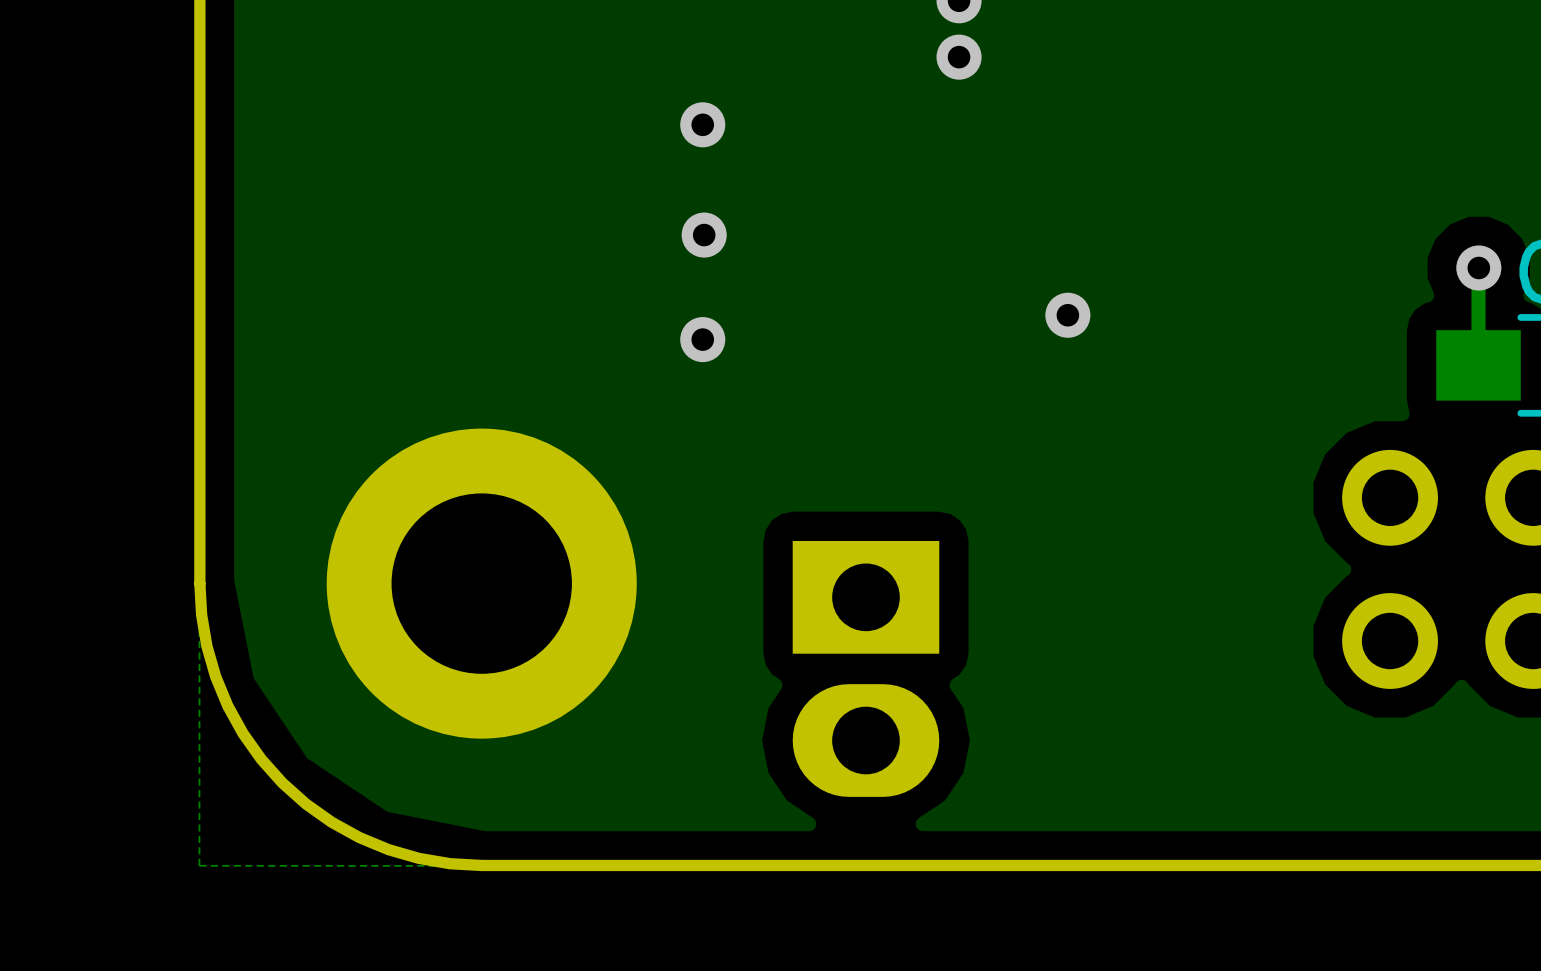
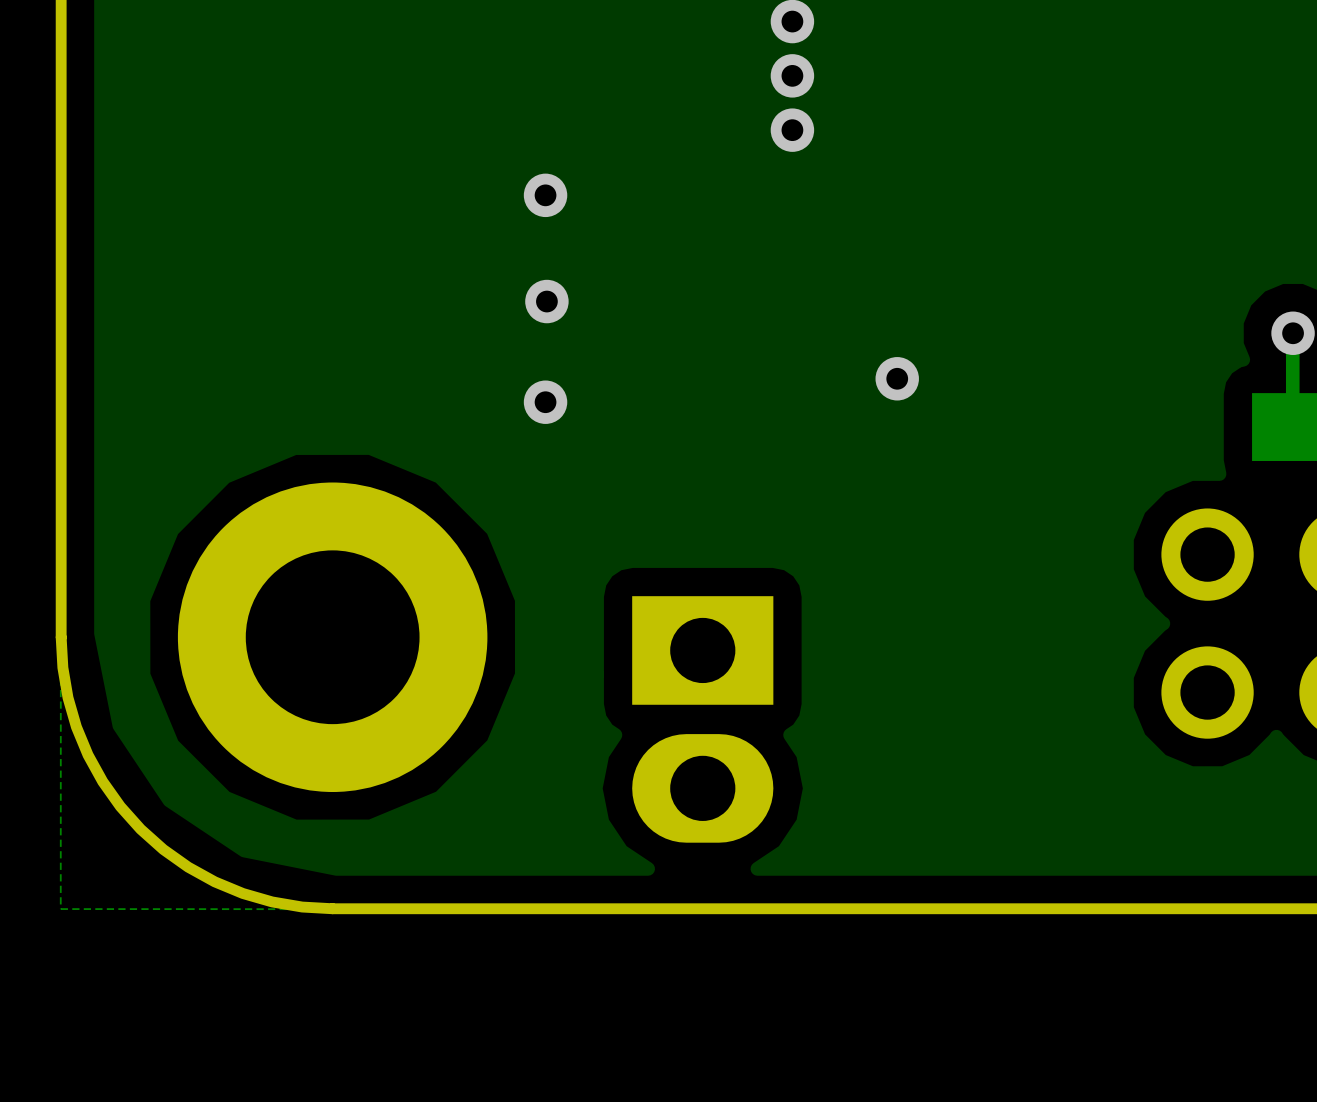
part footprint: [326, 428, 637, 739] -> [177, 482, 488, 793]

